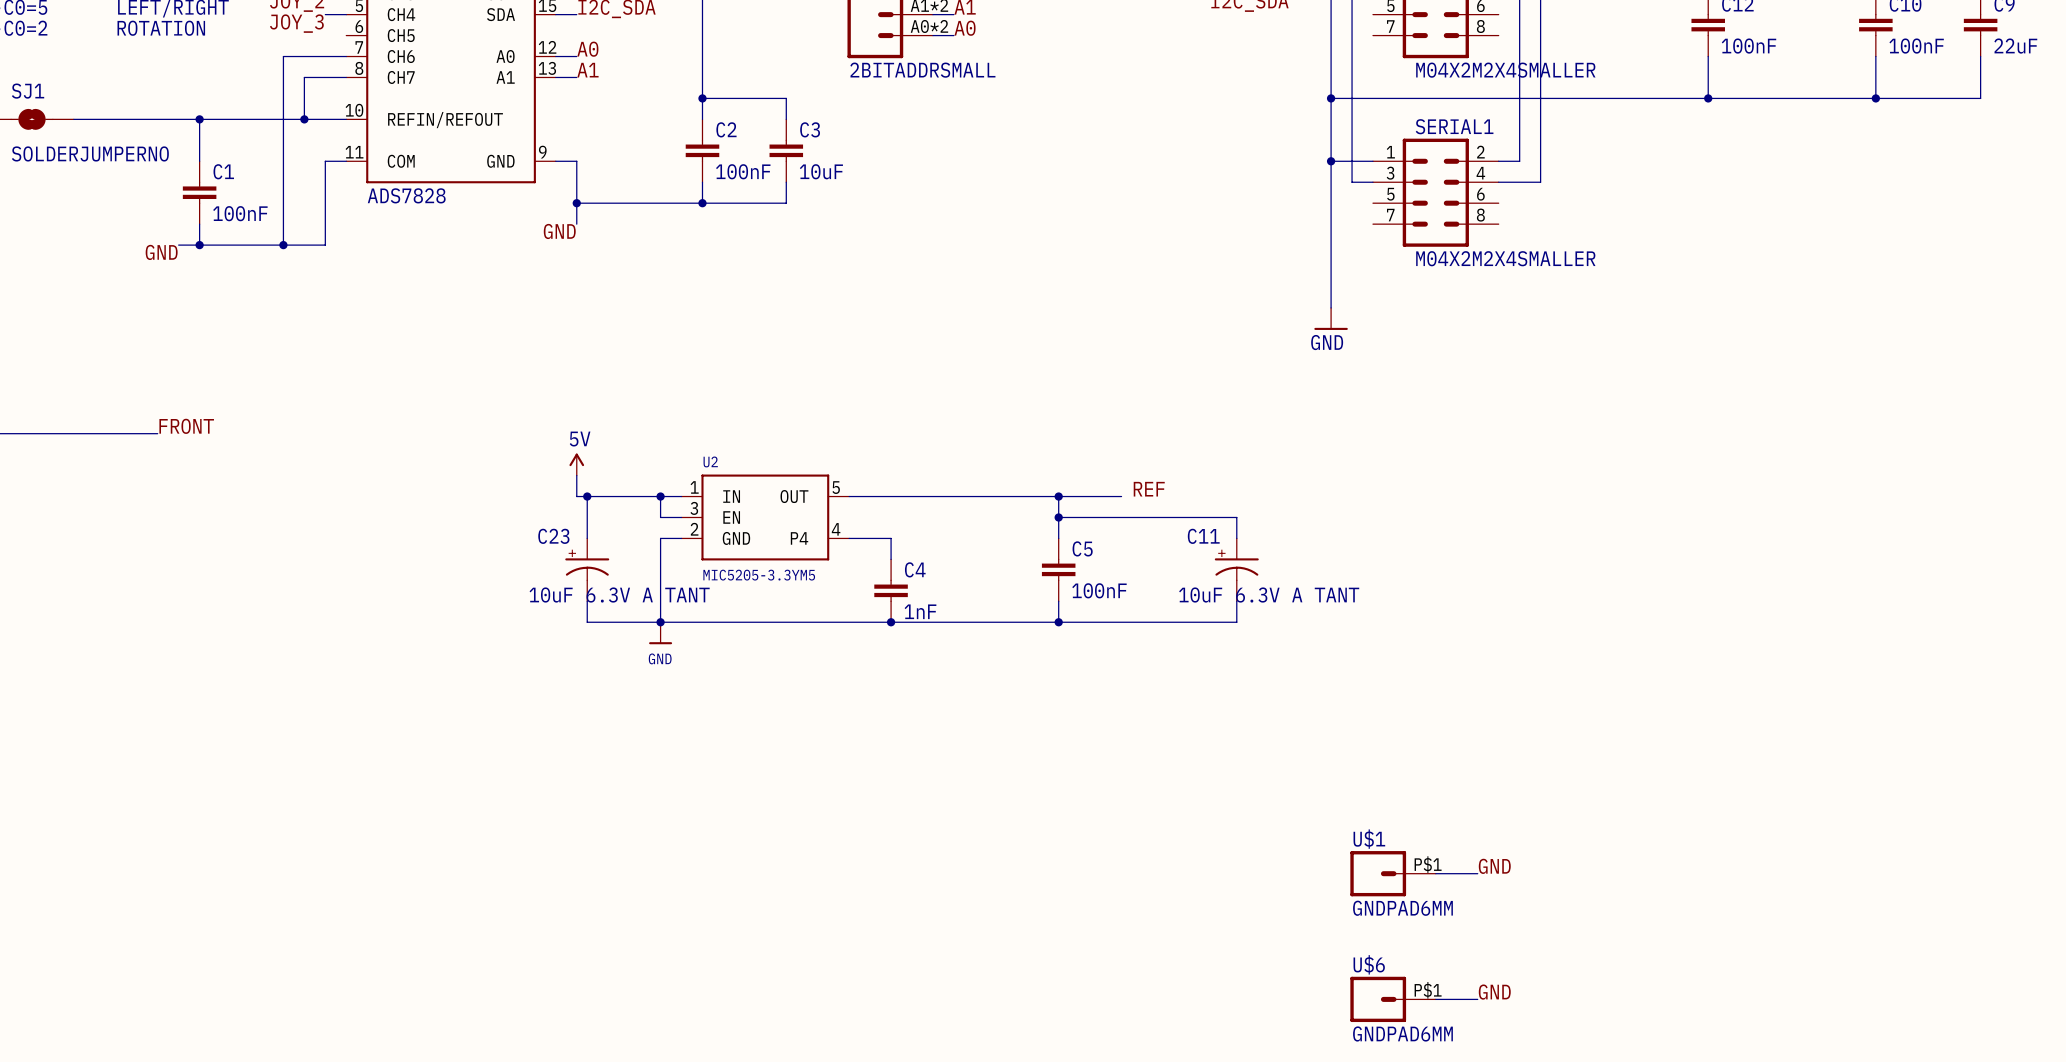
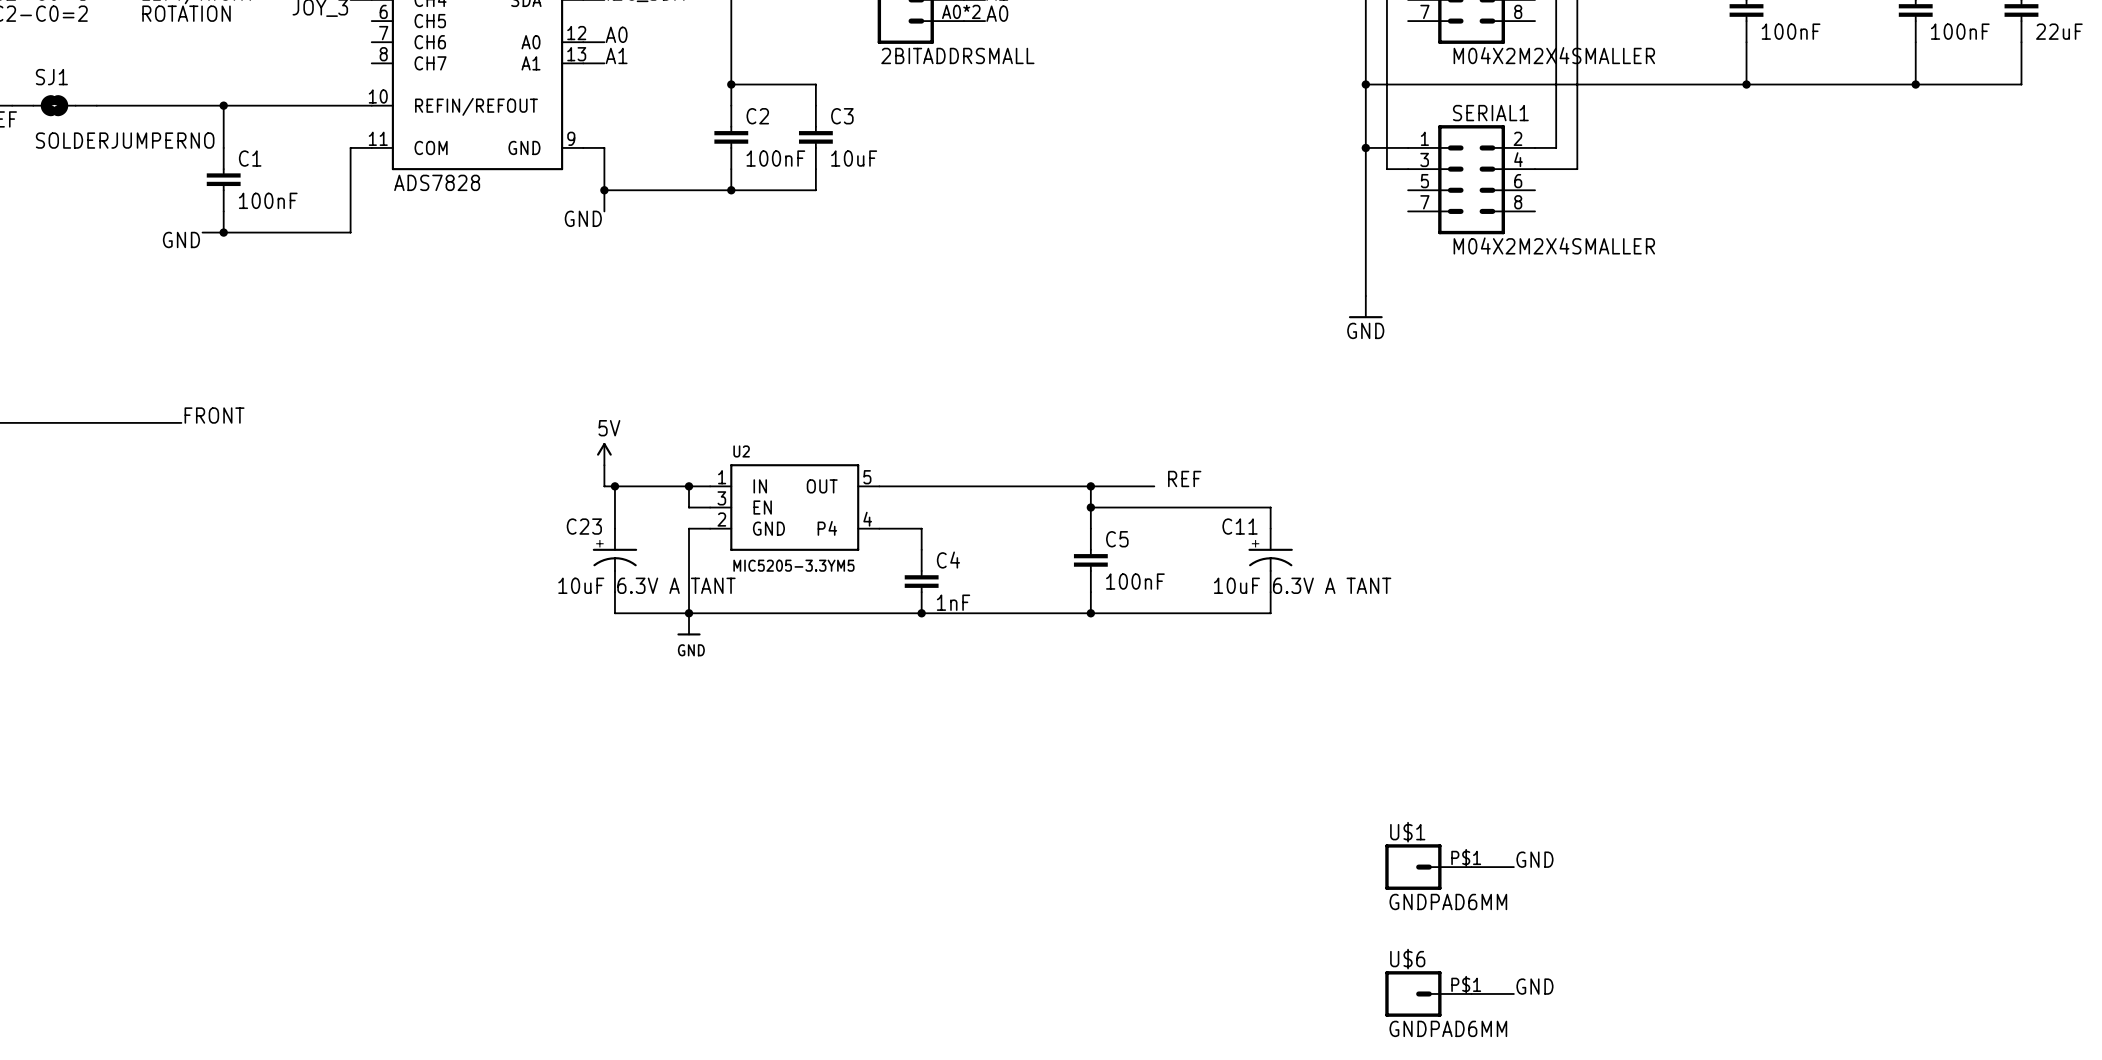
wire: (346, 56) (283, 56) (283, 245) -> none
wire: (346, 77) (304, 77) (304, 119) -> none
junction: (304, 119) -> none
junction: (283, 245) -> none

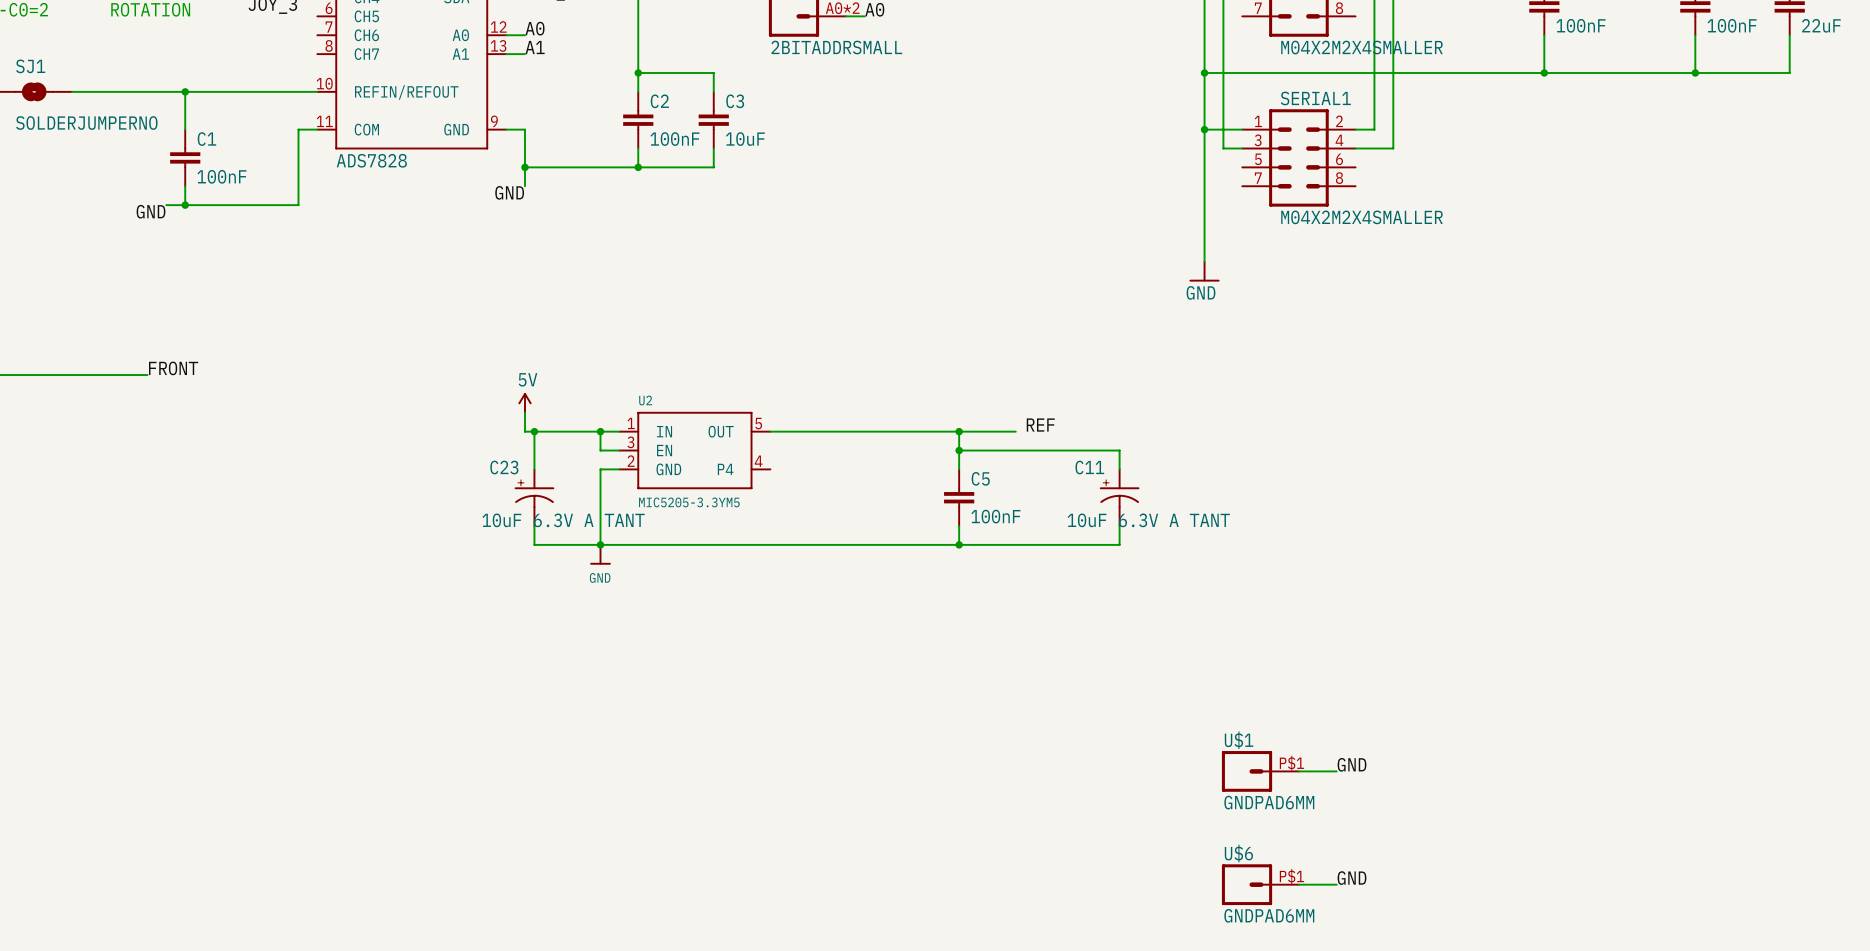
wire: (879, 528) (921, 528) (921, 549) -> none
C4: 1nF (921, 581) -> none
junction: (921, 613) -> none

